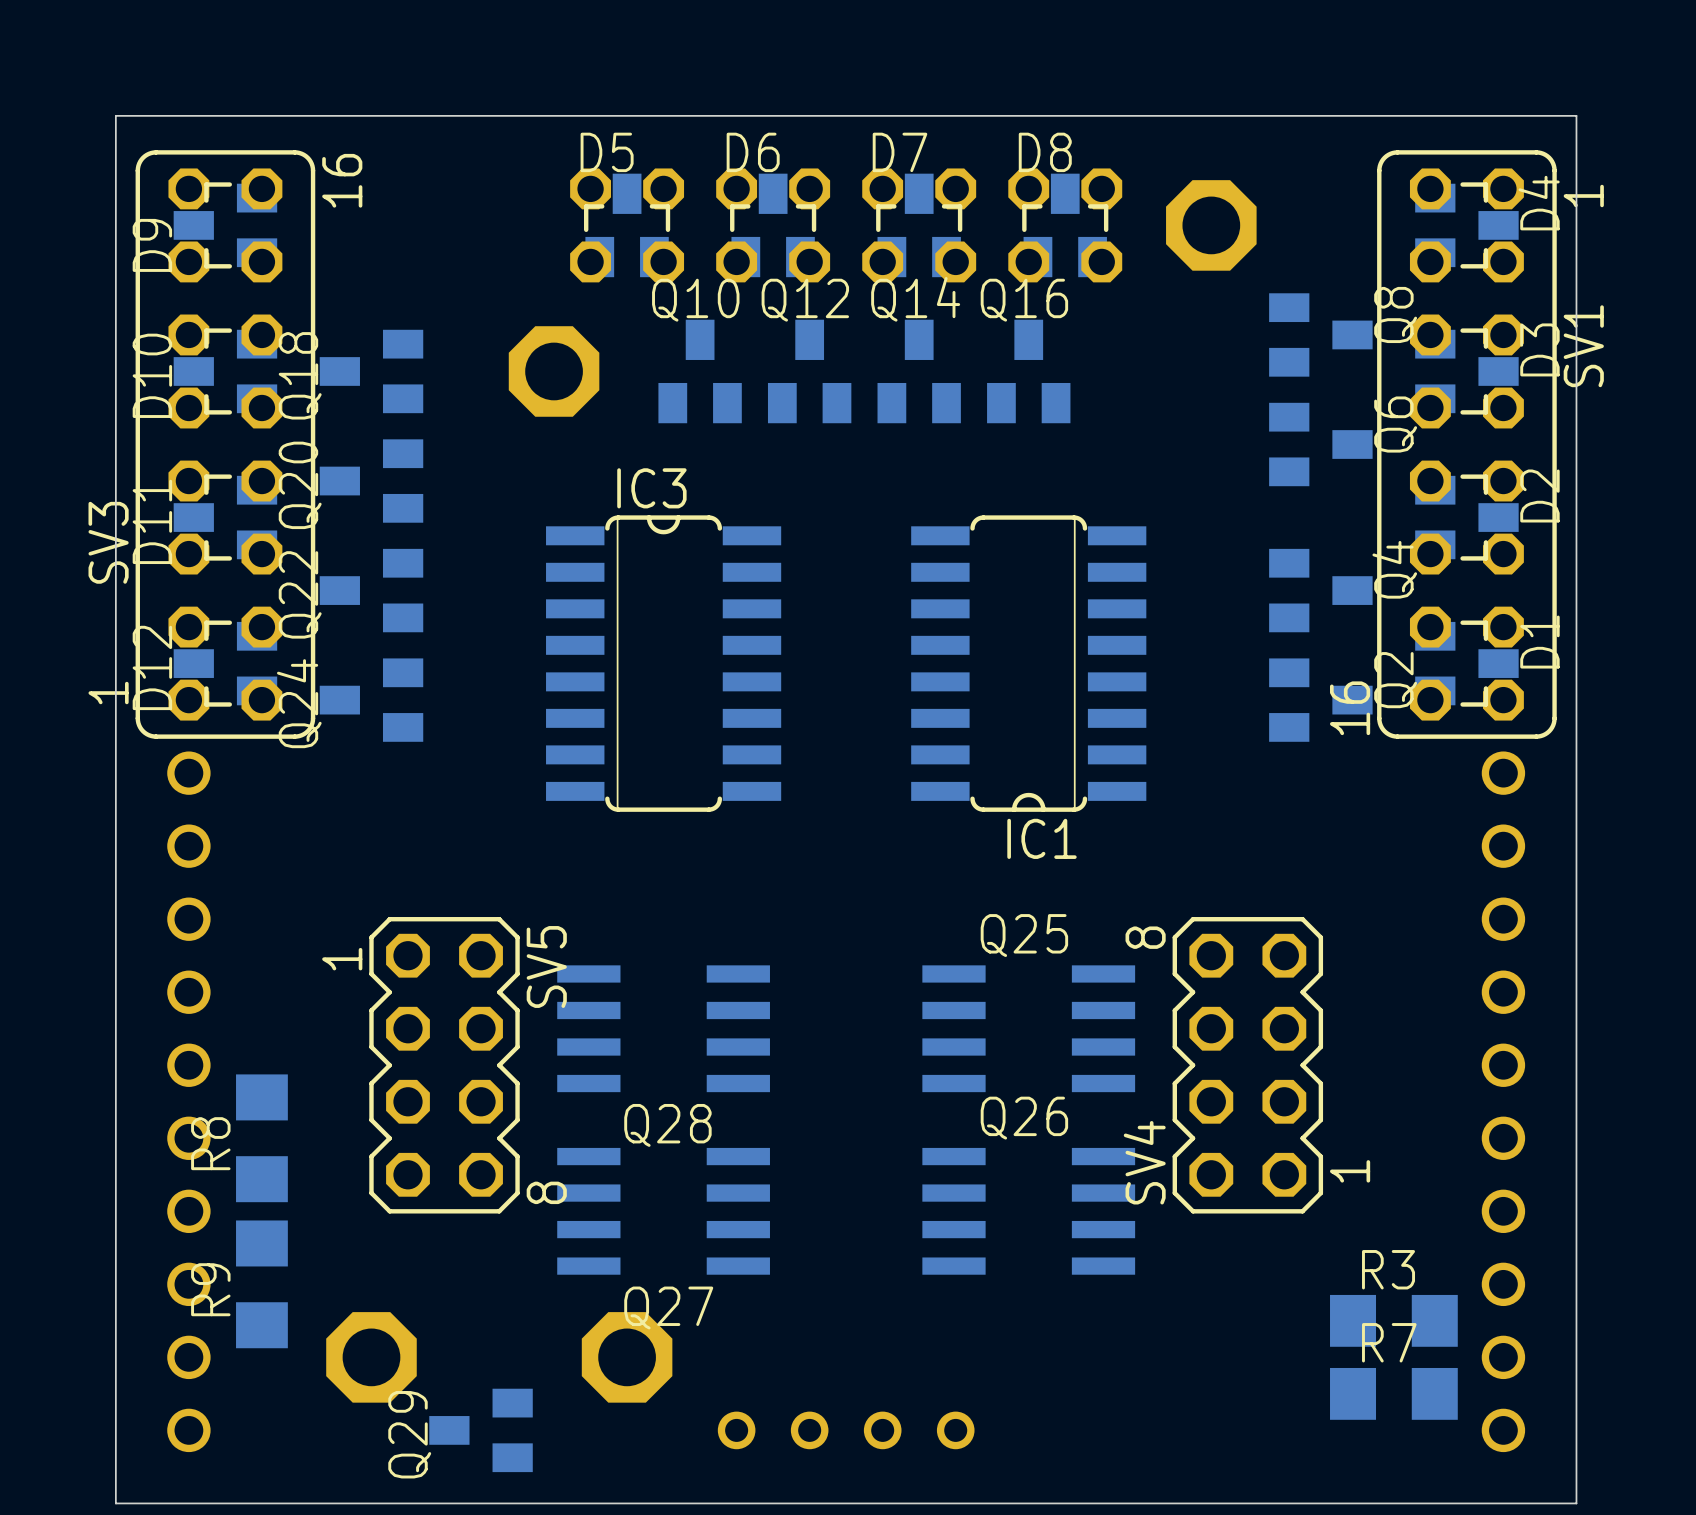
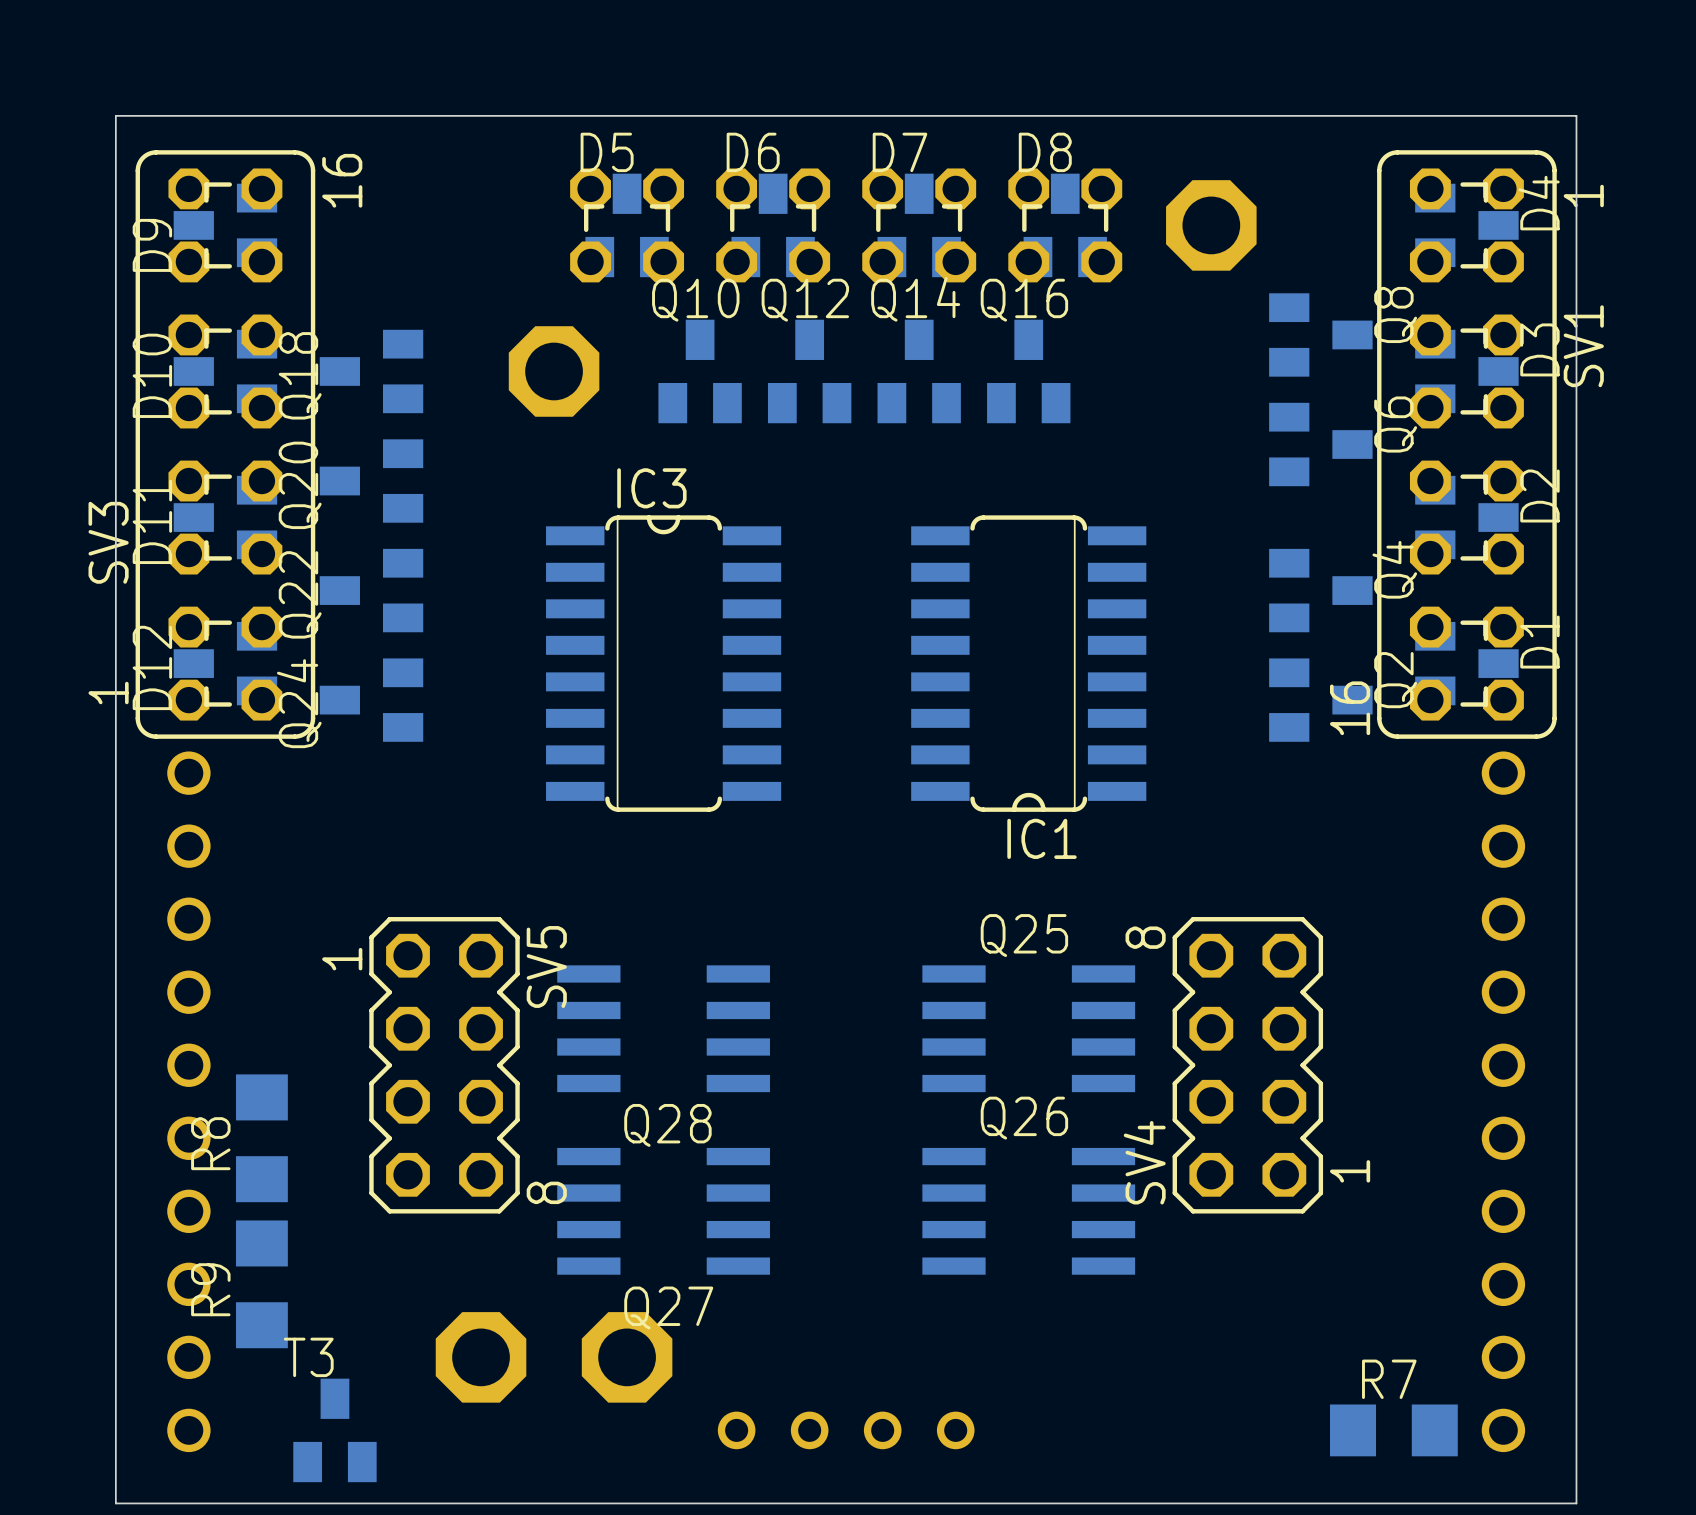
R3: (1393, 1320) -> none
part position: (371, 1357) -> (481, 1357)
R7 position: (1393, 1393) -> (1393, 1430)
T3: none -> (334, 1430)
Q29: (481, 1430) -> none

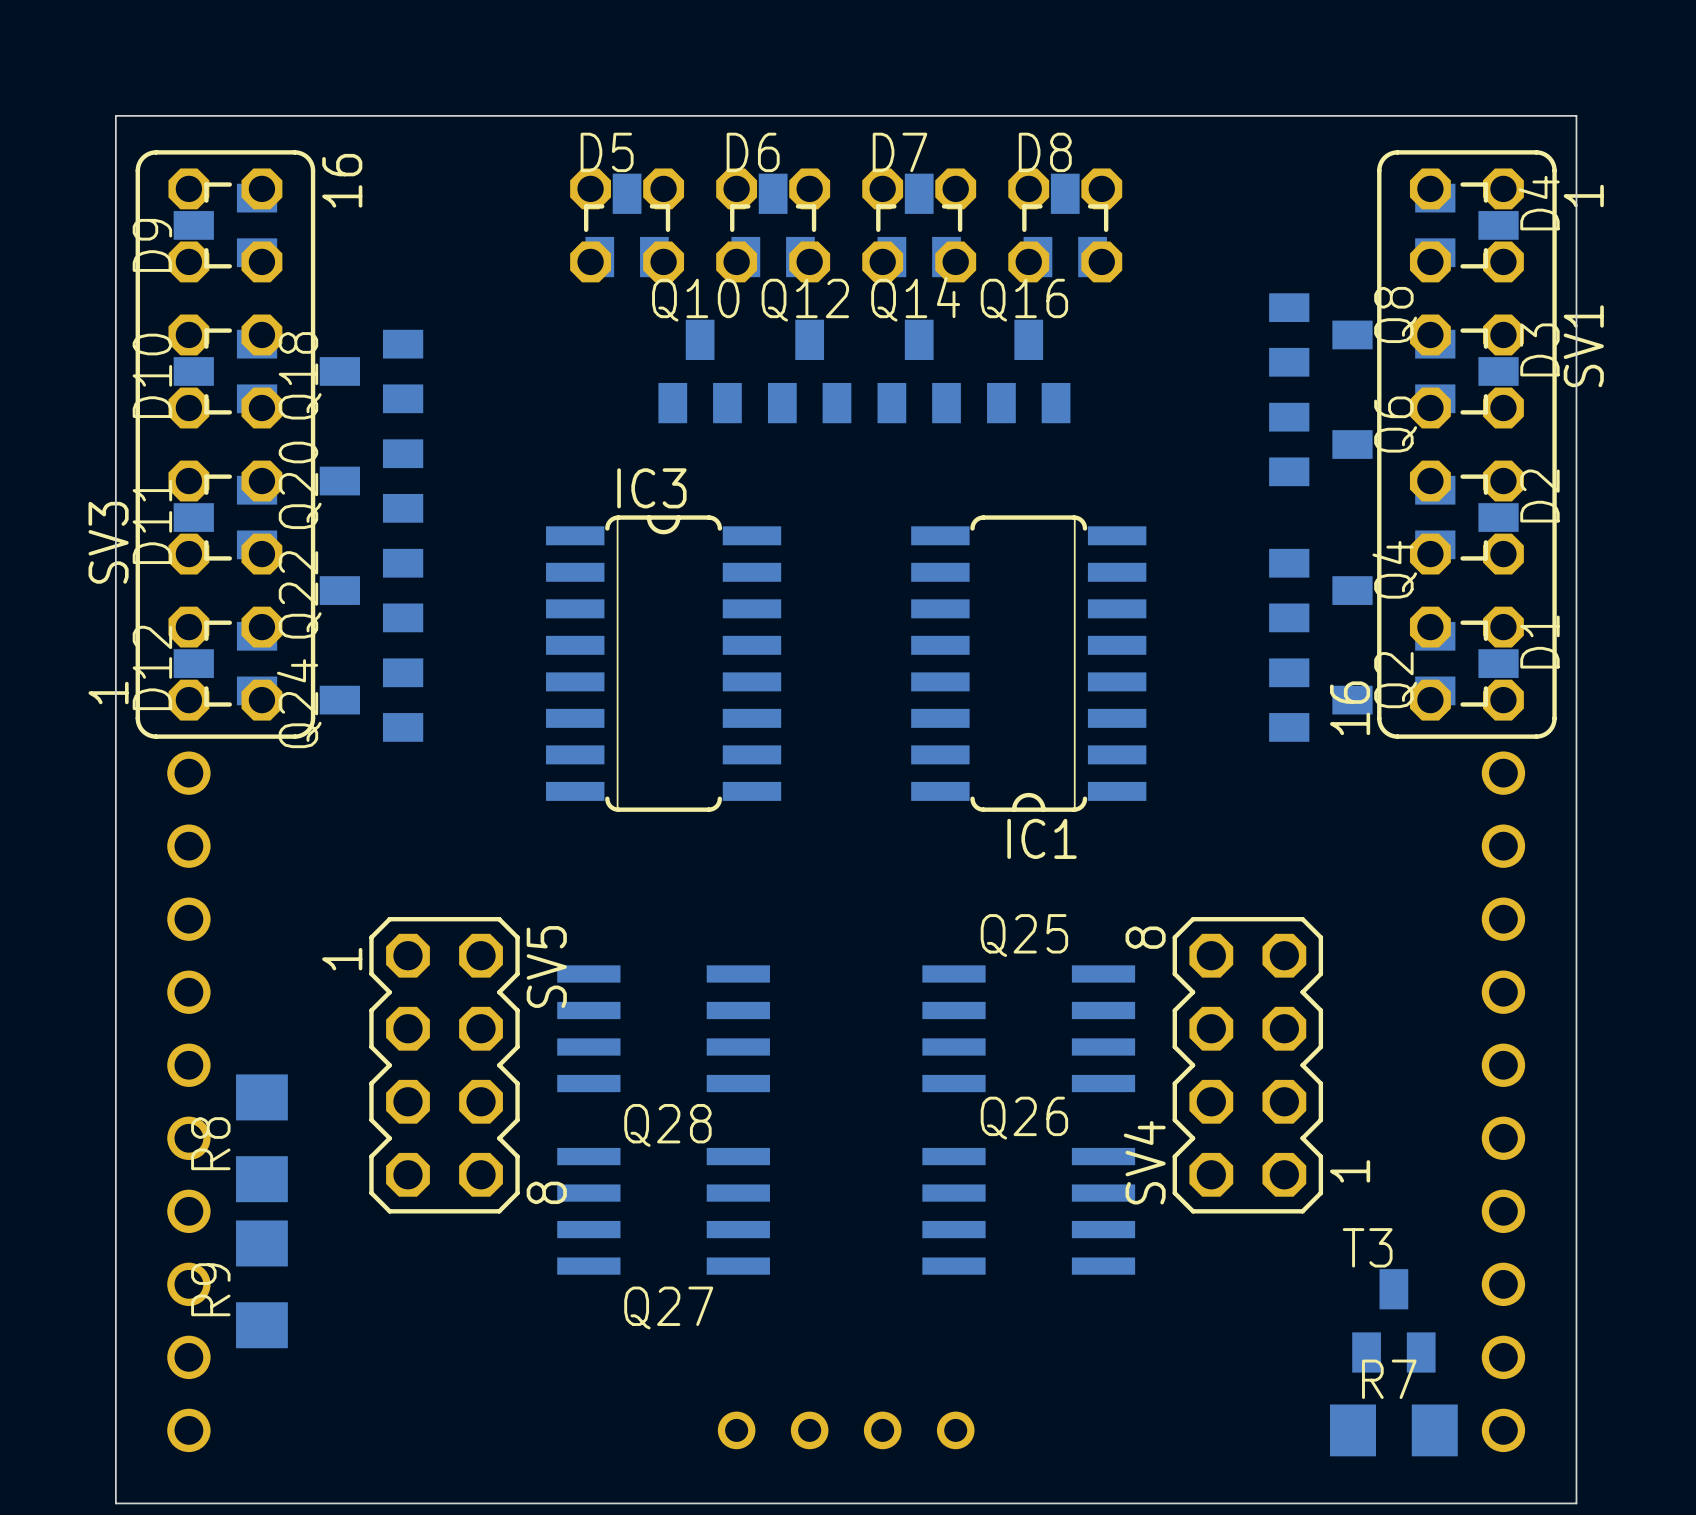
part: (1211, 225) -> none
part: (554, 371) -> none
part: (481, 1357) -> none
part: (627, 1357) -> none
T3 position: (334, 1430) -> (1393, 1320)

